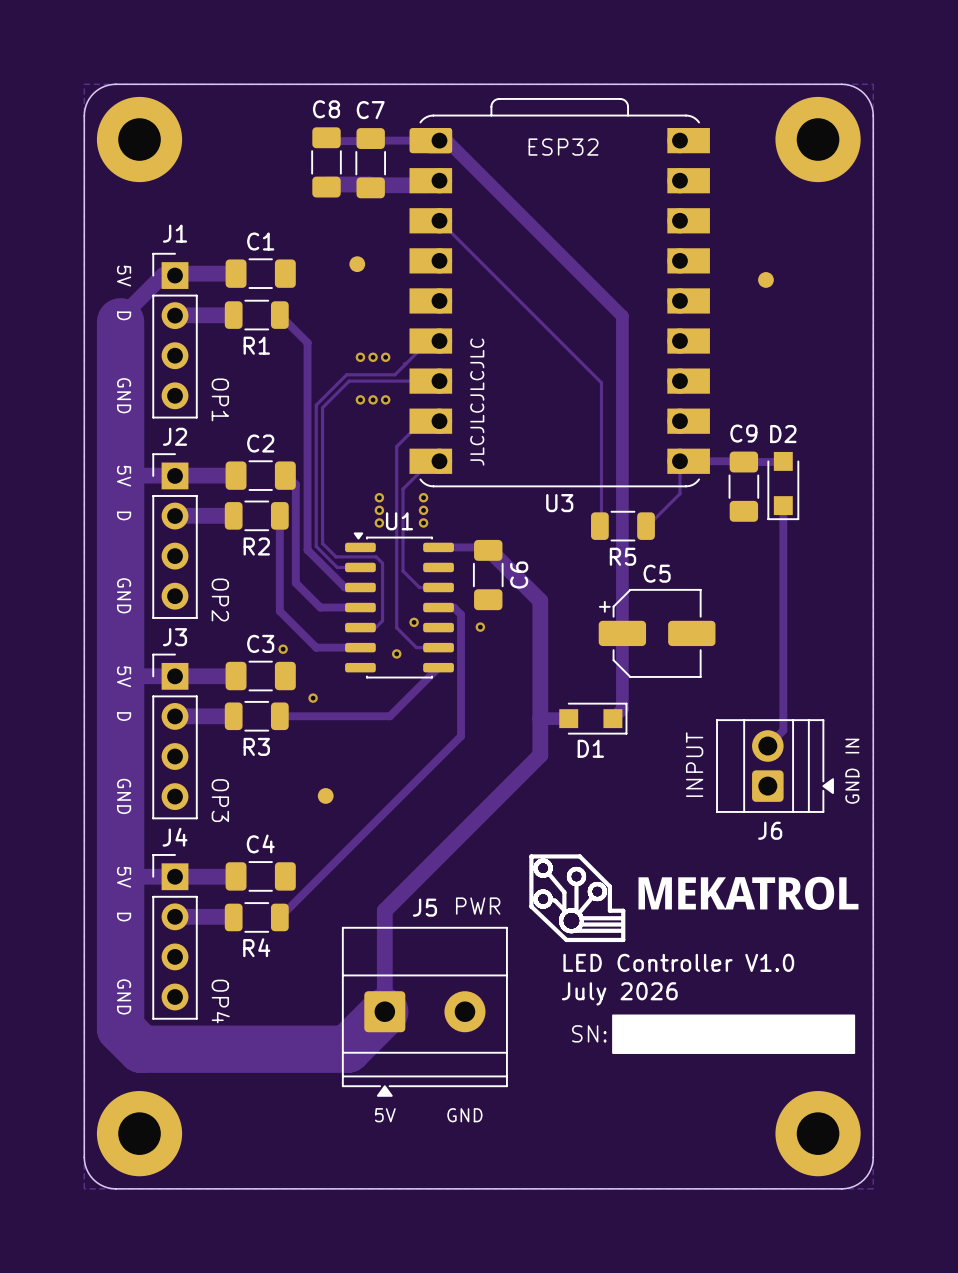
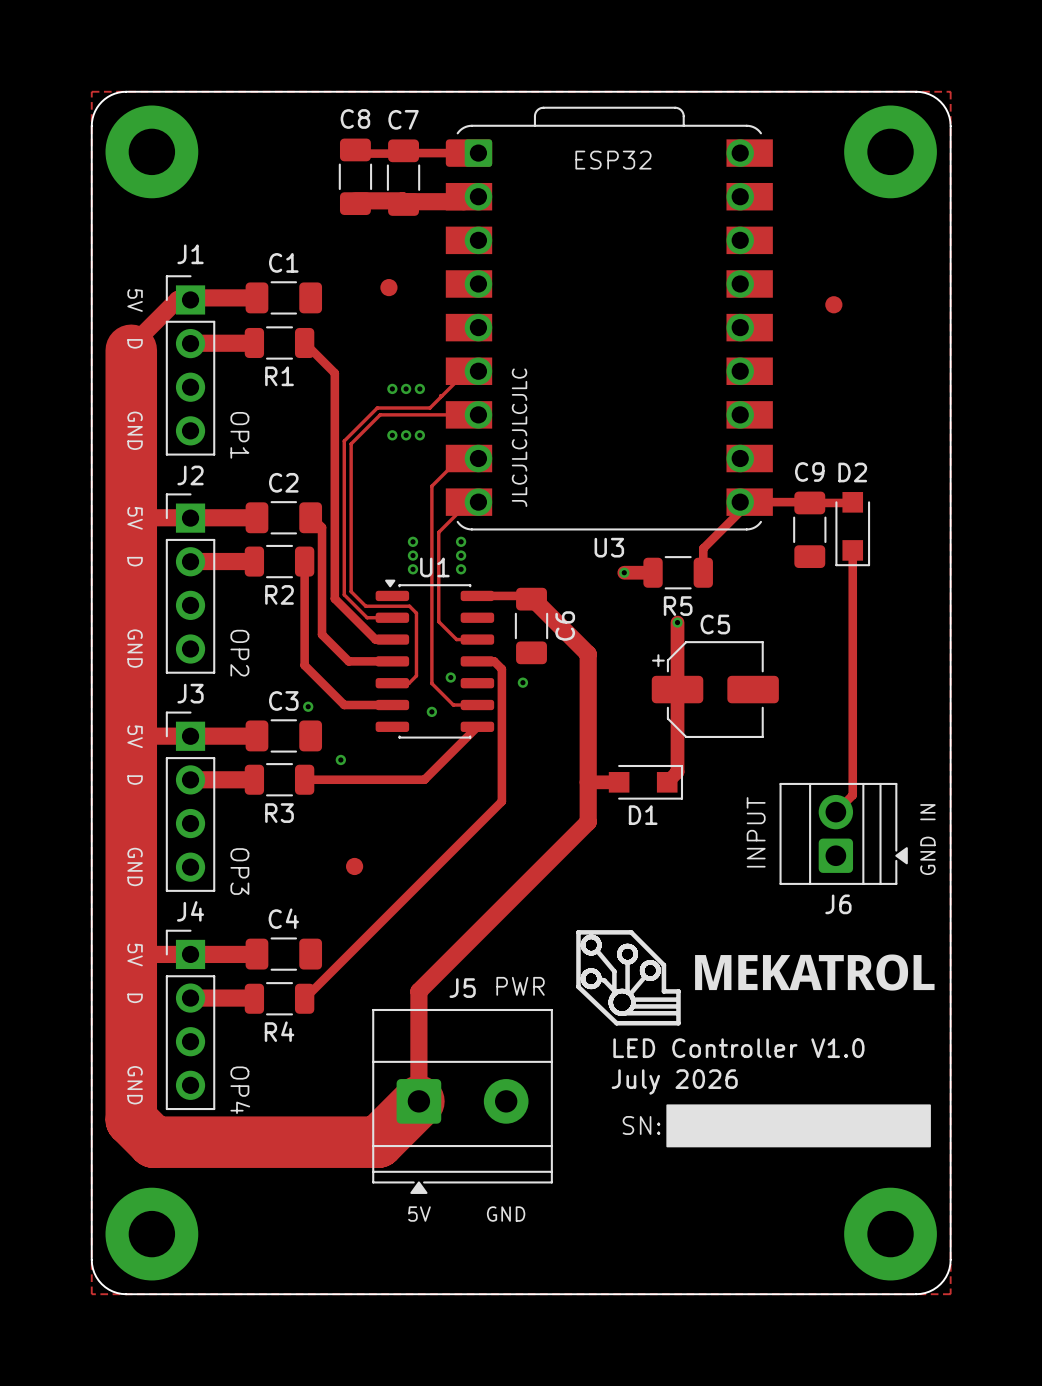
track: (439, 140) (446, 140) (622, 316) (622, 571) -> none
track: (439, 220) (601, 382) (601, 526) -> none
track: (679, 461) (679, 493) (647, 526) -> none
track: none -> (749, 502) (703, 548) (703, 572)
track: none -> (624, 572) (653, 572)
via: none -> (624, 572)
via: none -> (677, 622)

